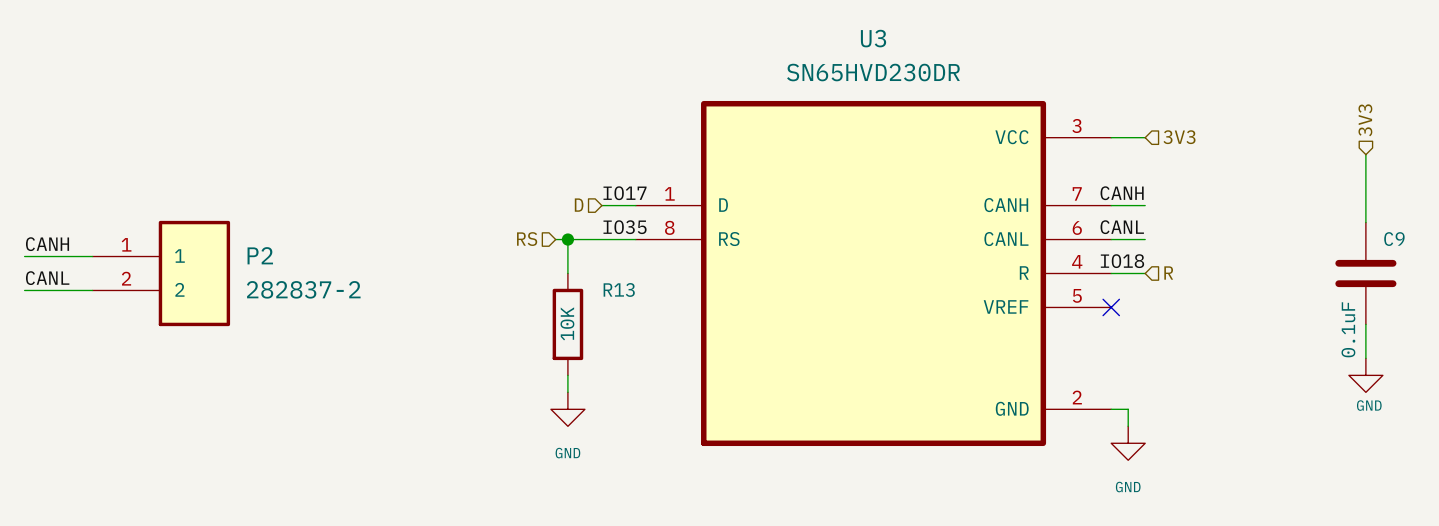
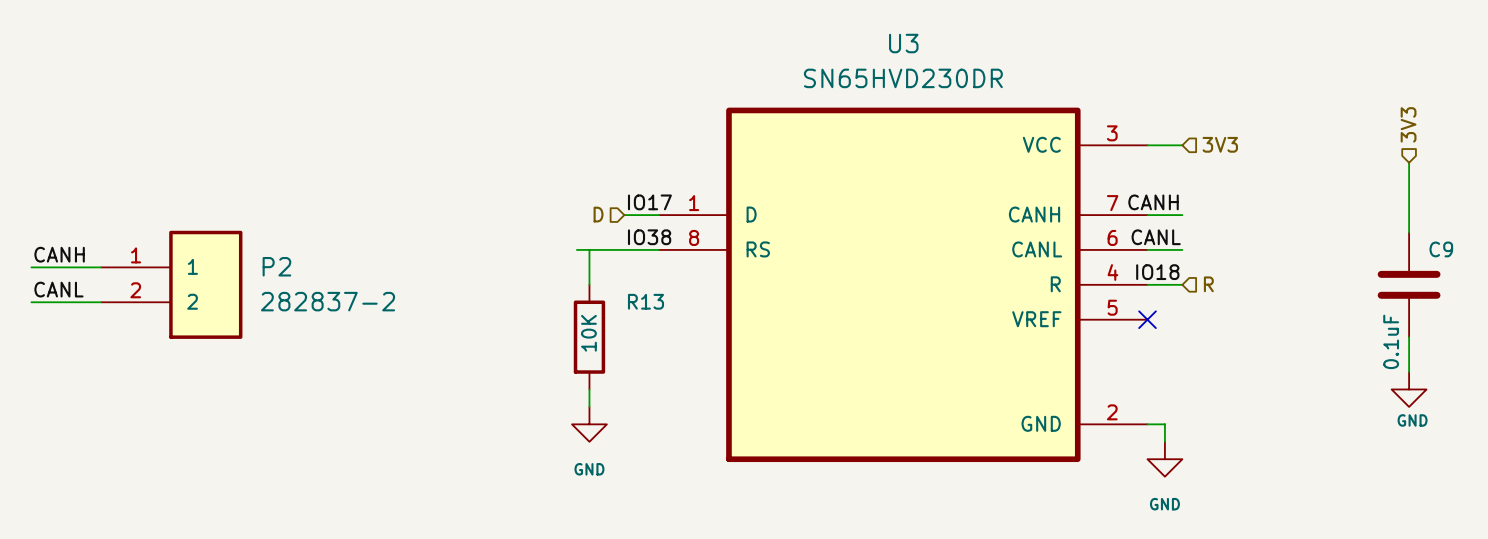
label: IO35 (625, 227) -> IO38 (649, 237)
hierarchical label: RS (527, 239) -> none
junction: (567, 239) -> none

